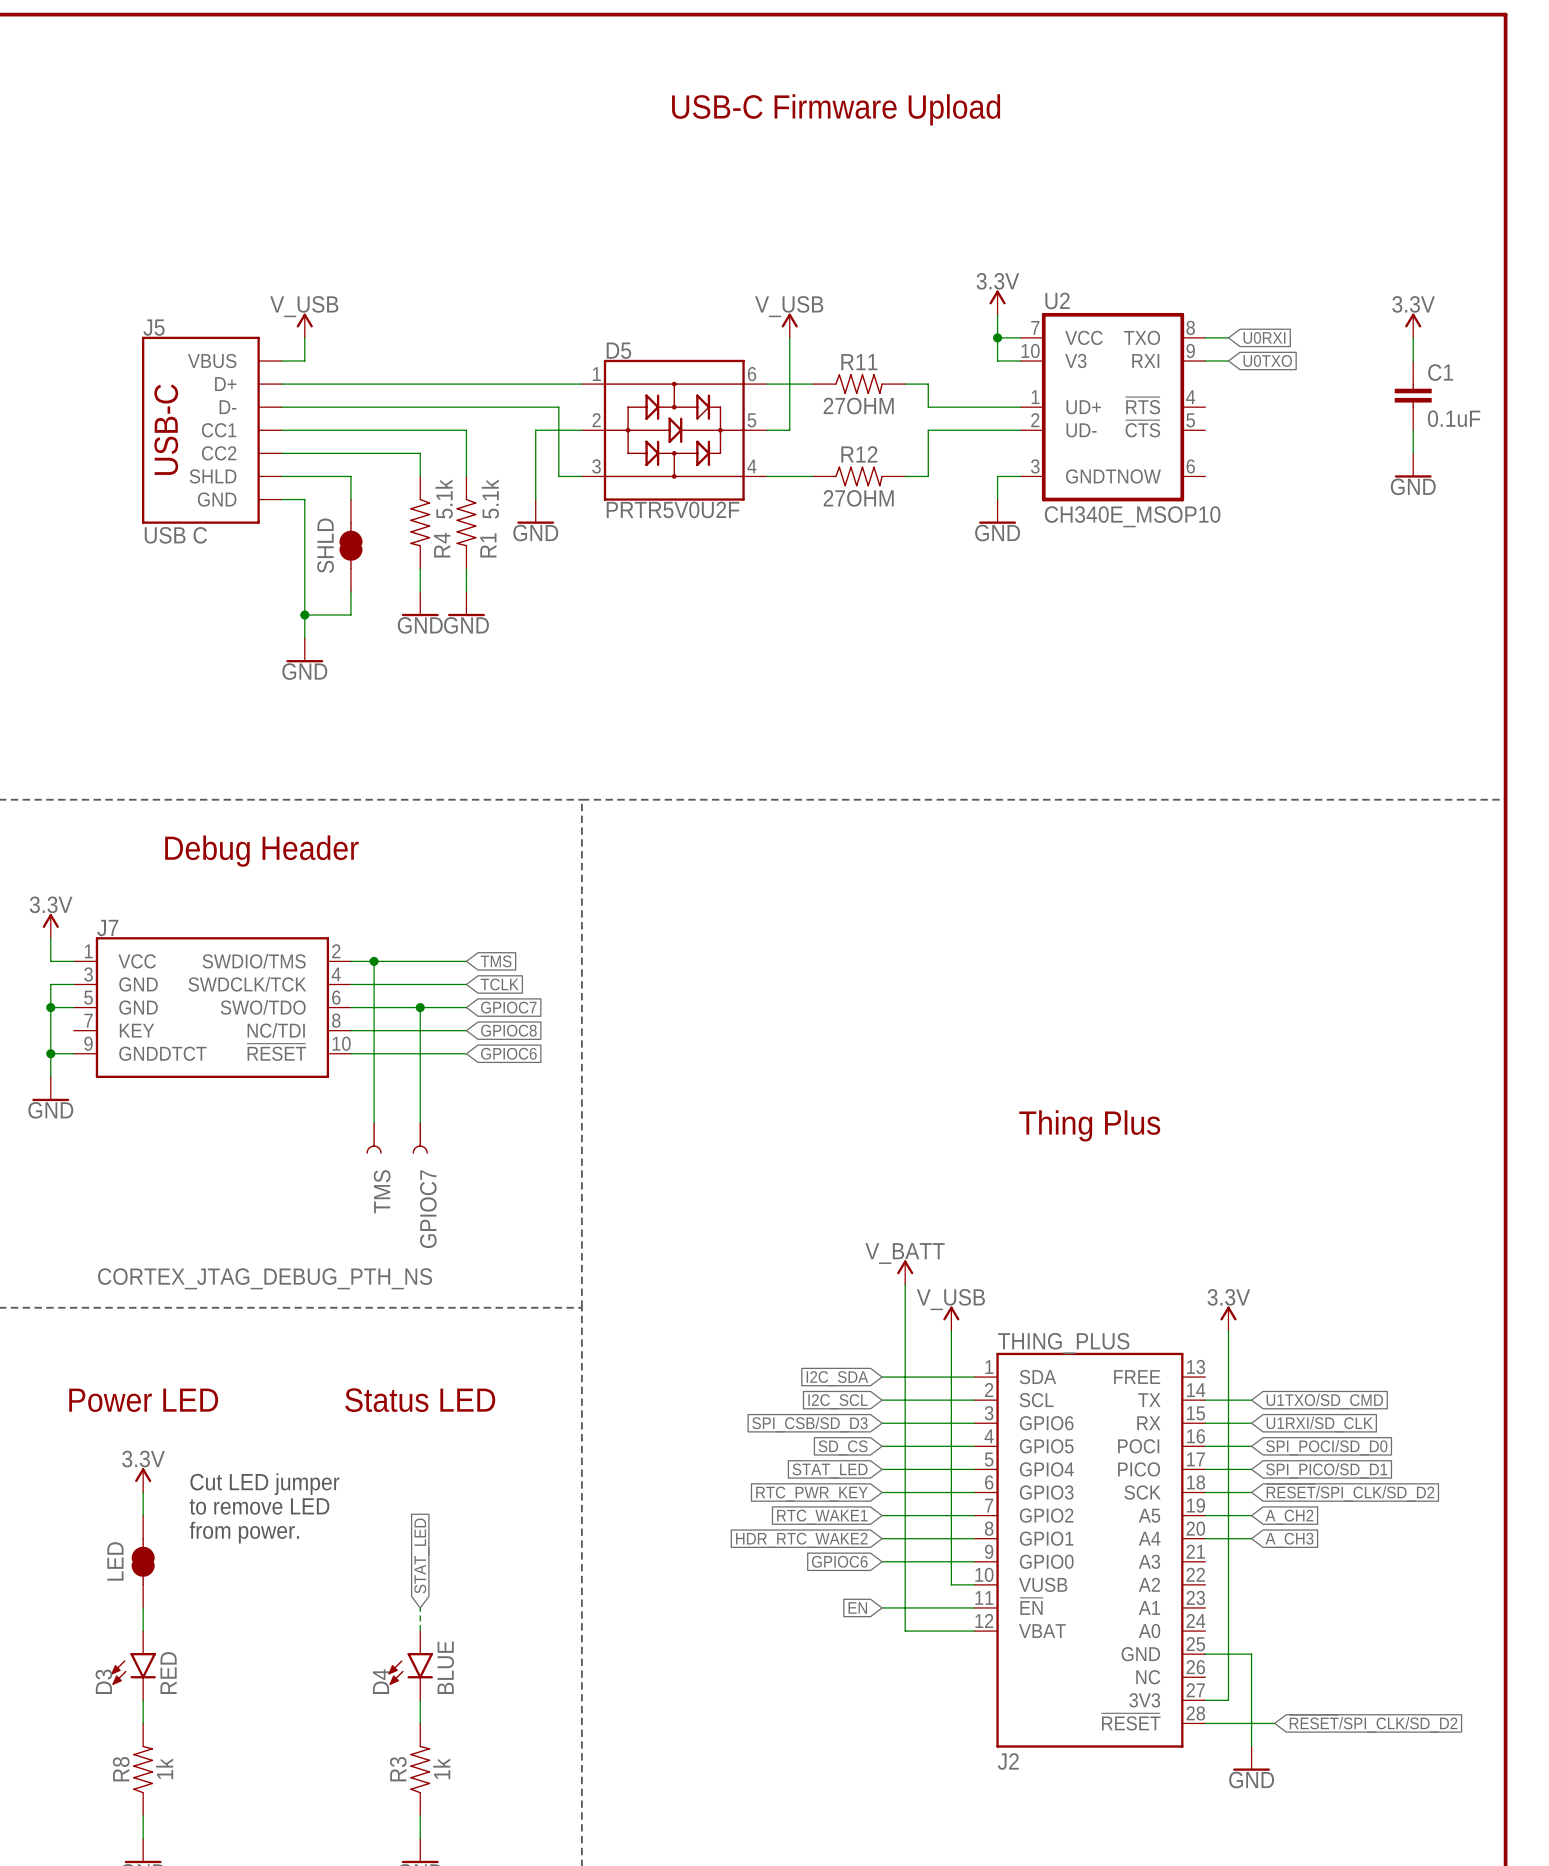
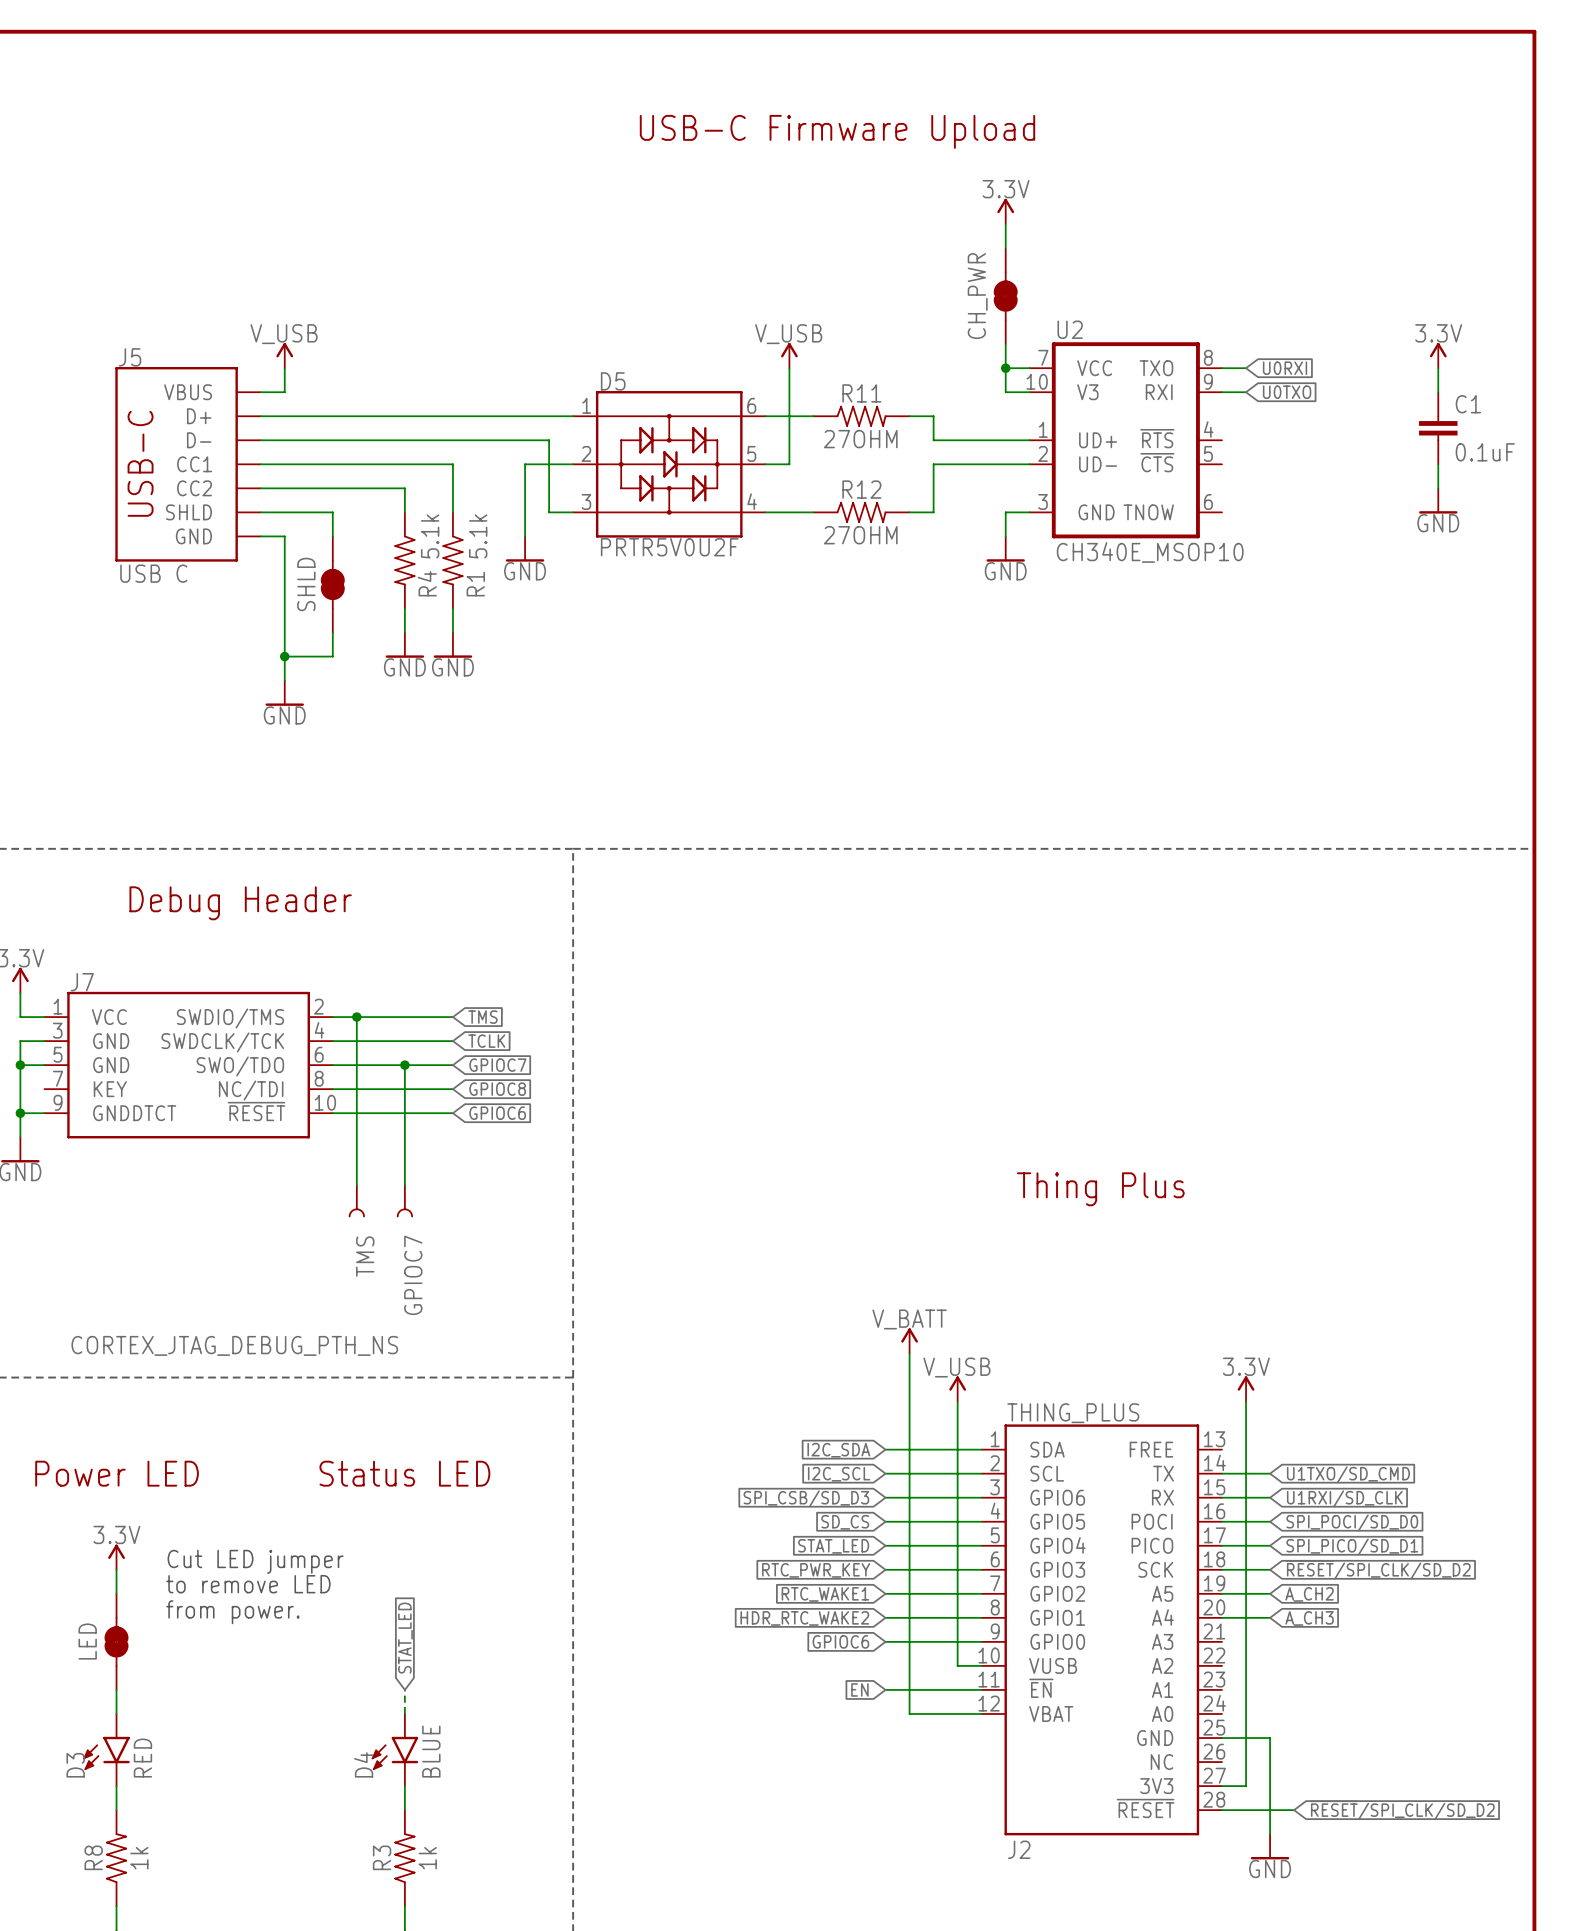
wire: none -> (1005, 224) (1005, 248)
CH_PWR: none -> (1005, 296)
power symbol position: 3.3V (997, 302) -> 3.3V (1005, 211)

